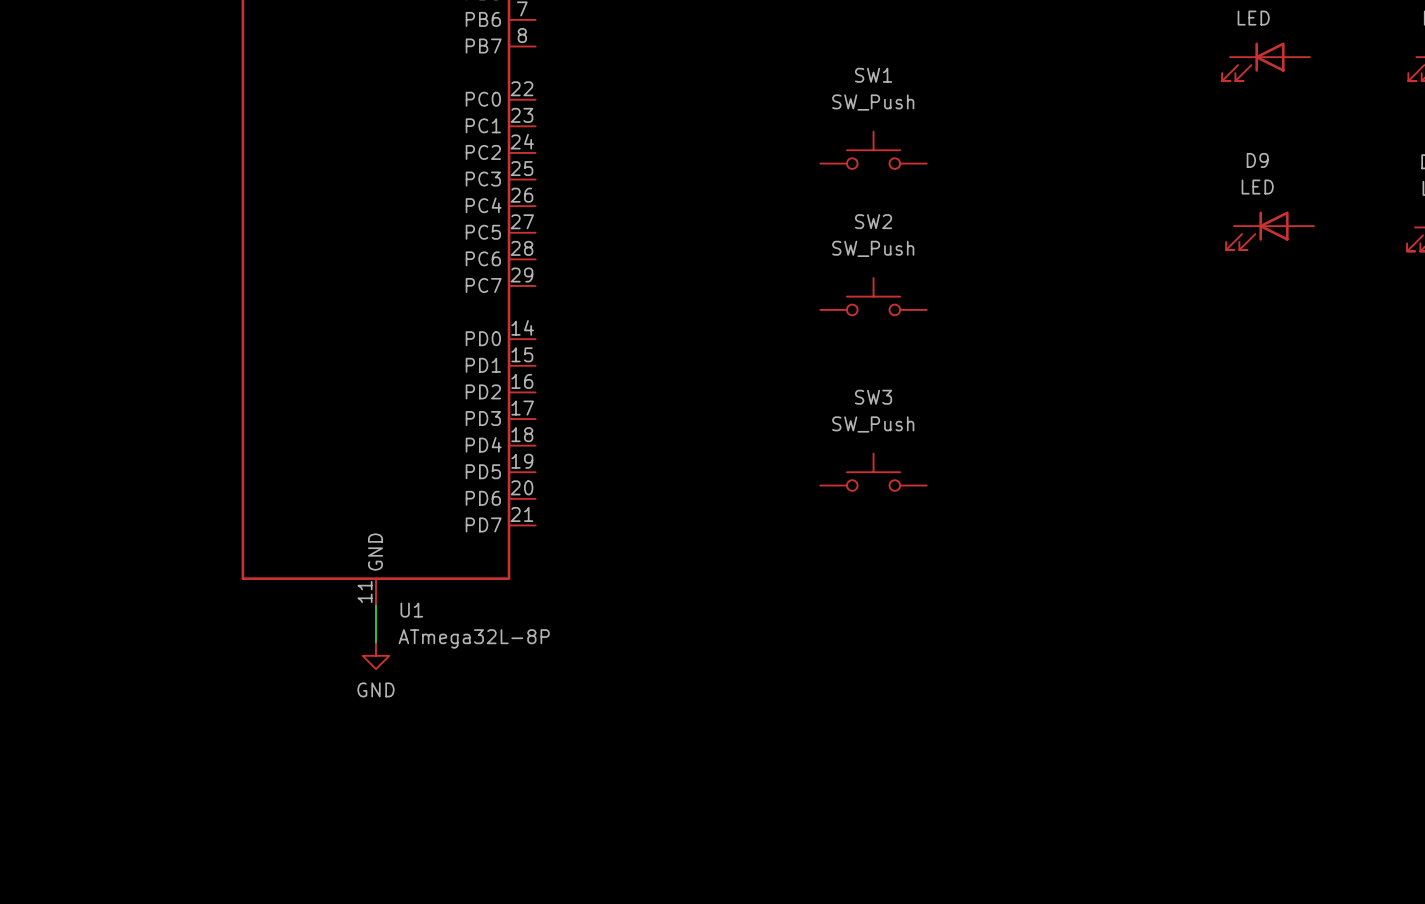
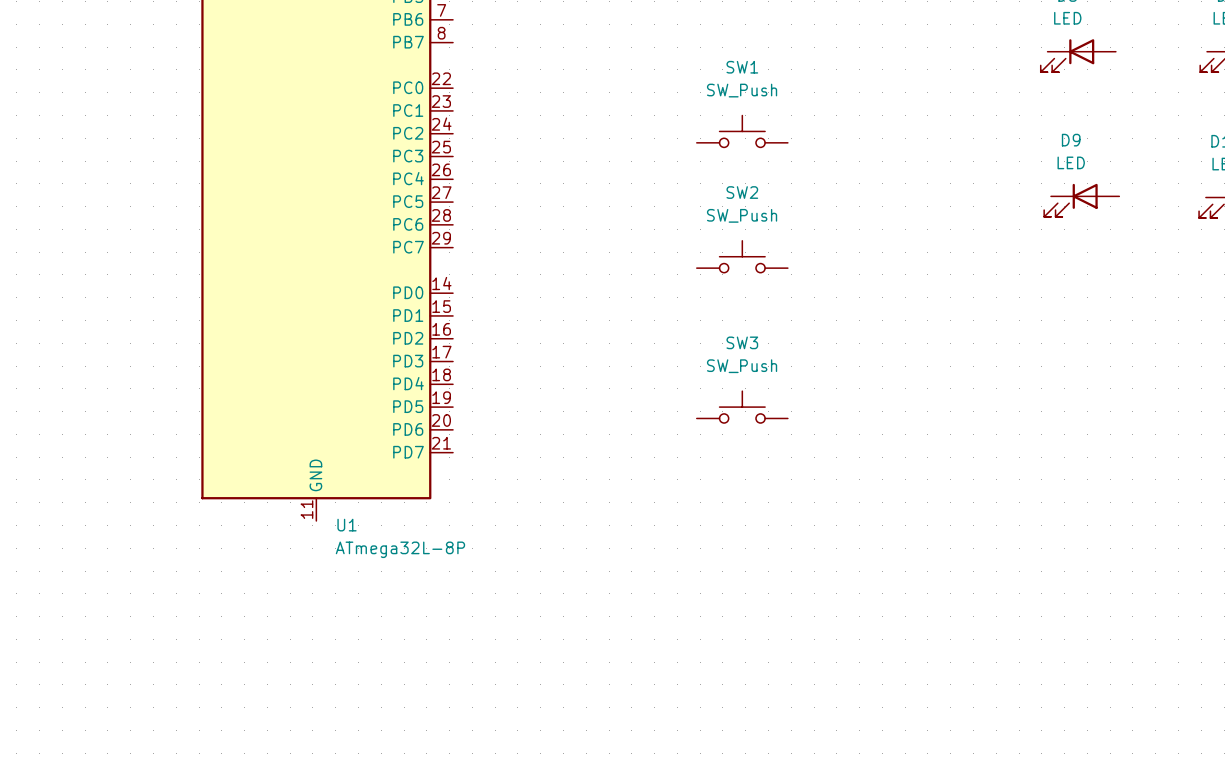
wire: (375, 605) (375, 642) -> none
power symbol: GND (375, 655) -> none

